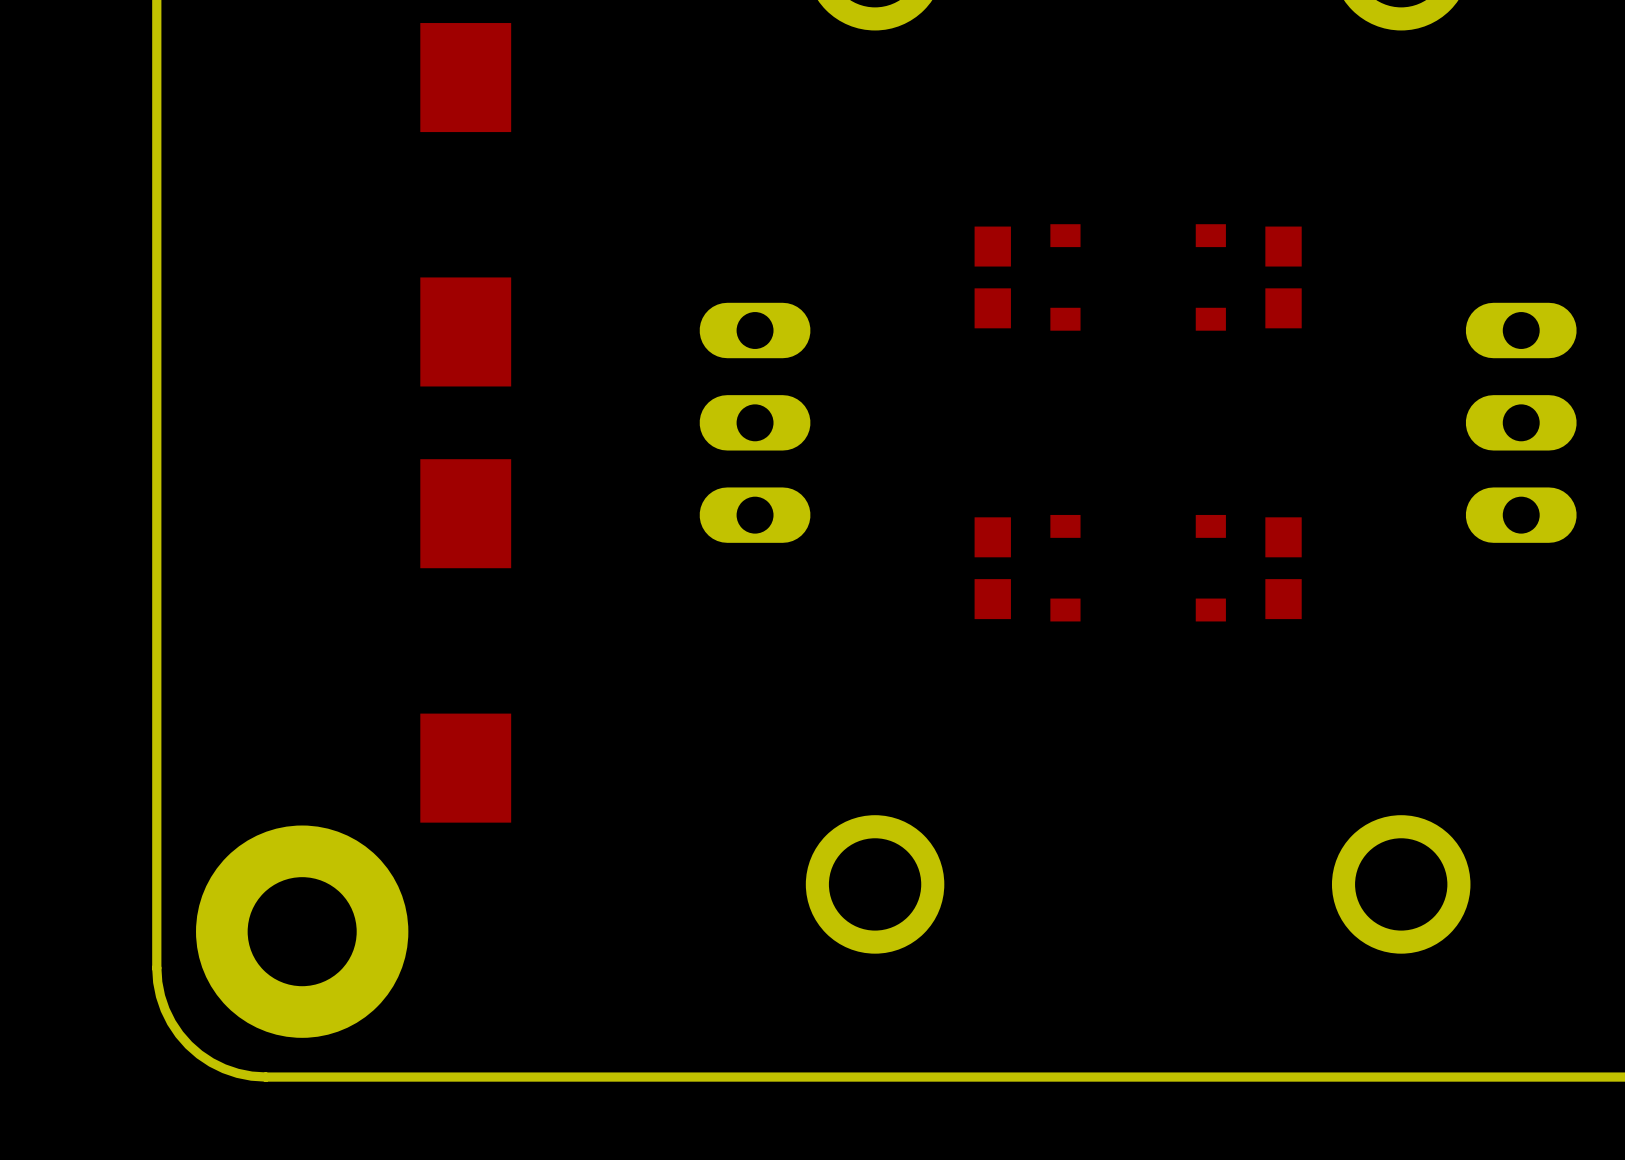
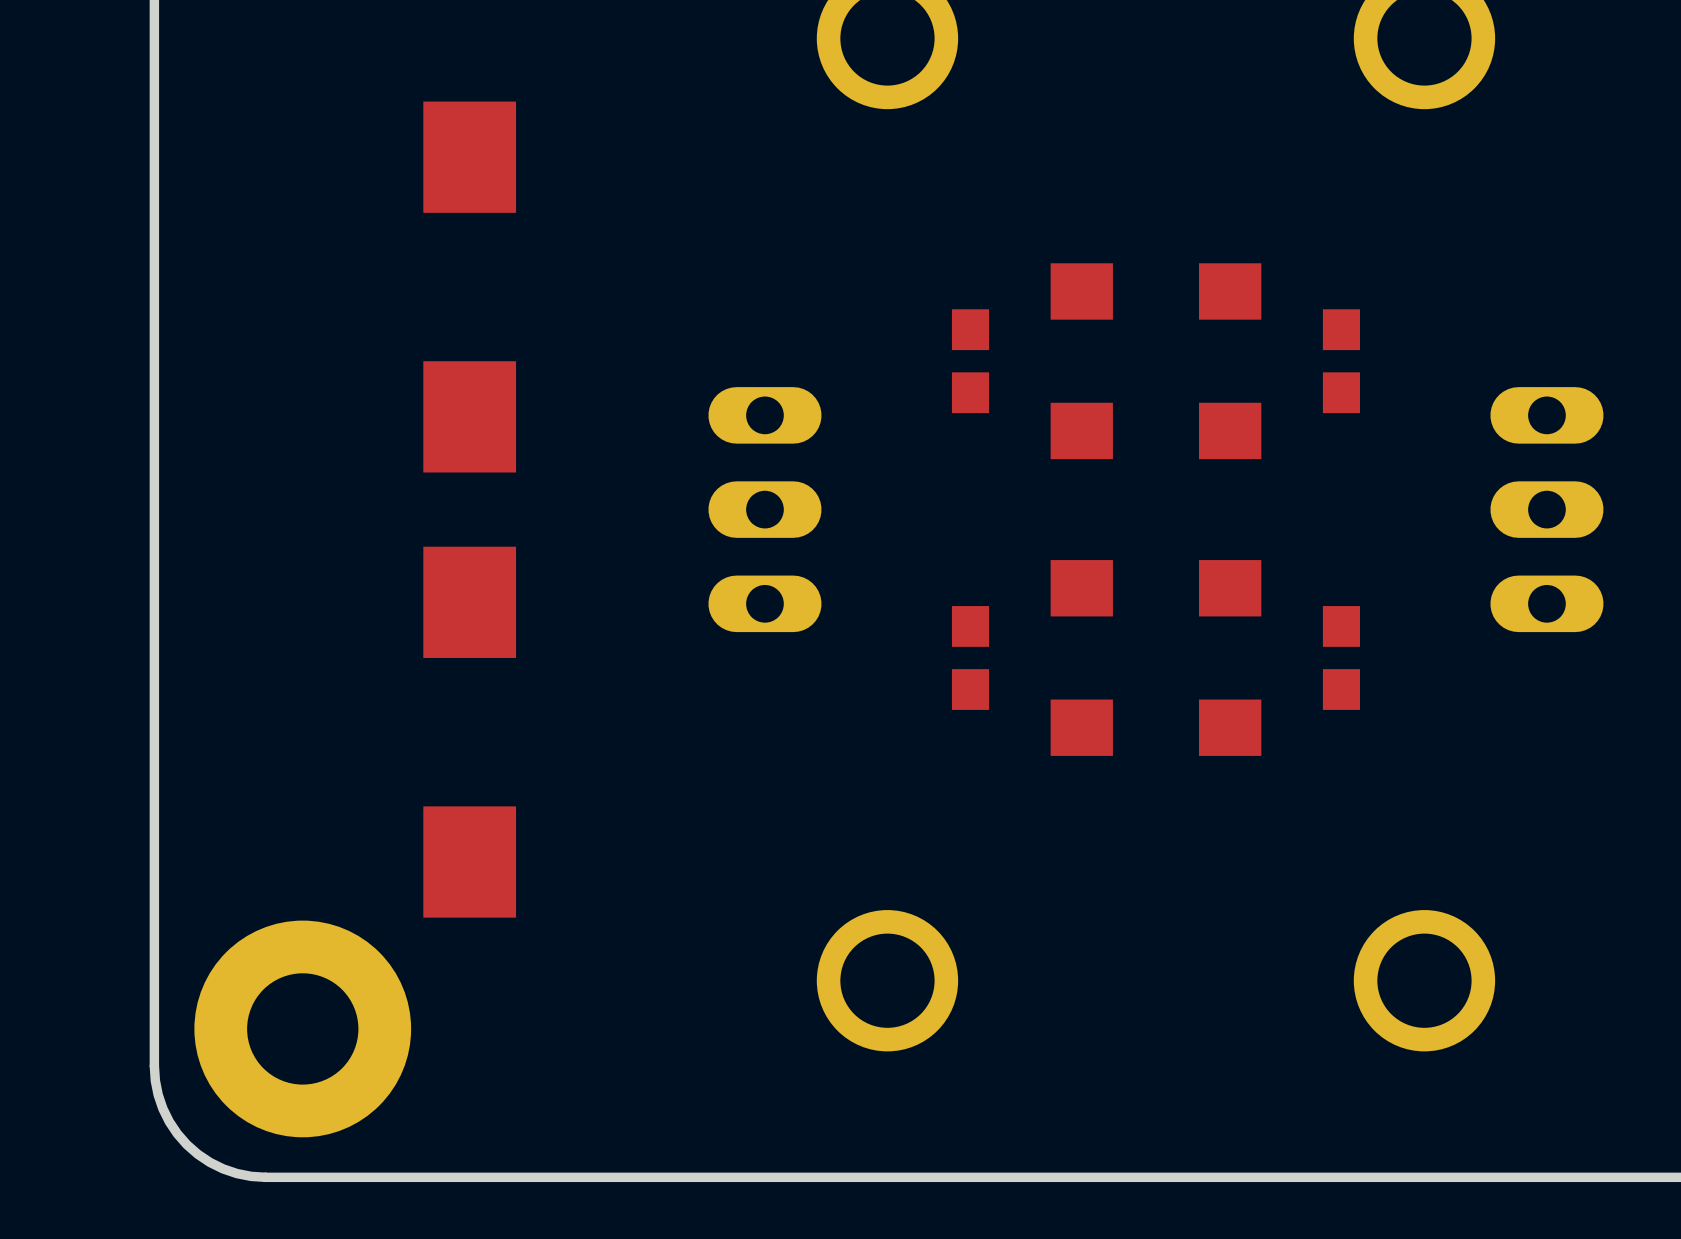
part footprint: [1050, 224, 1081, 331] -> [1050, 263, 1113, 460]
part footprint: [1195, 224, 1226, 331] -> [1199, 263, 1262, 460]
part position: (992, 277) -> (970, 361)
part position: (1283, 277) -> (1341, 361)
part footprint: [1050, 514, 1081, 622] -> [1050, 560, 1113, 756]
part footprint: [1195, 514, 1226, 622] -> [1199, 560, 1262, 756]
part position: (992, 568) -> (970, 657)
part position: (1283, 568) -> (1341, 657)

